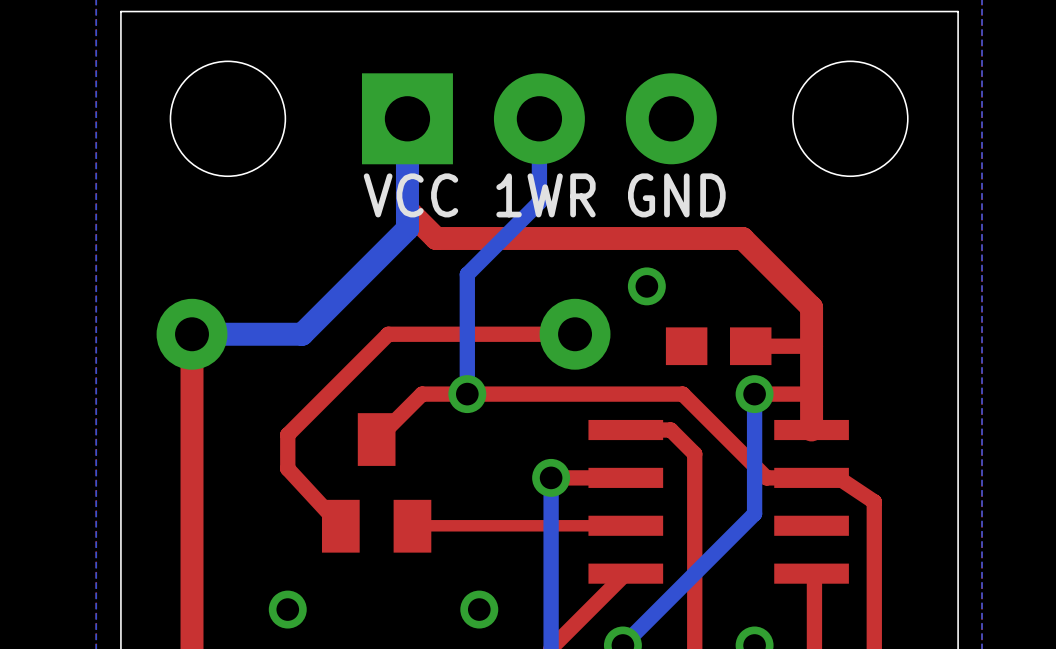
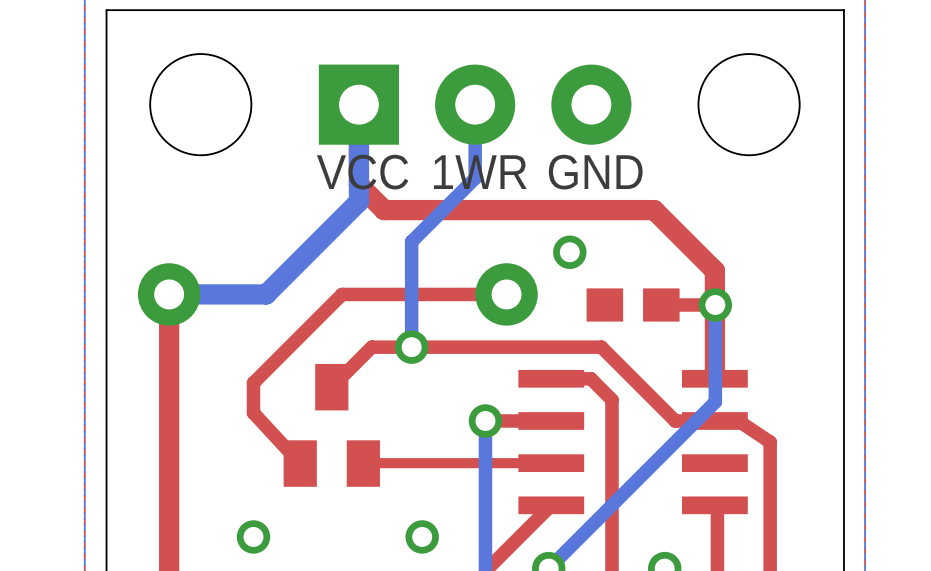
bottom track: (754, 394) (754, 513) -> (715, 304) (715, 401) (664, 452)
via position: (754, 394) -> (715, 304)
top track: (811, 394) (754, 394) -> none

